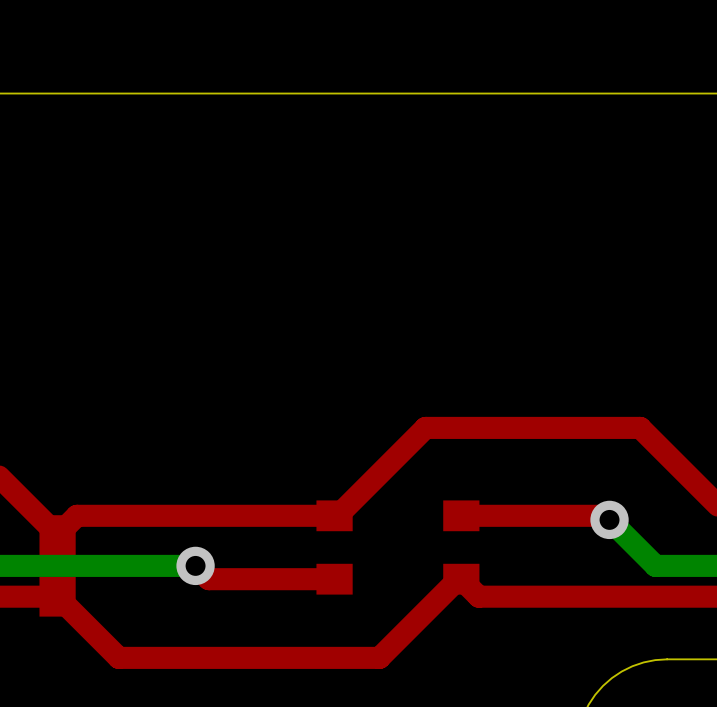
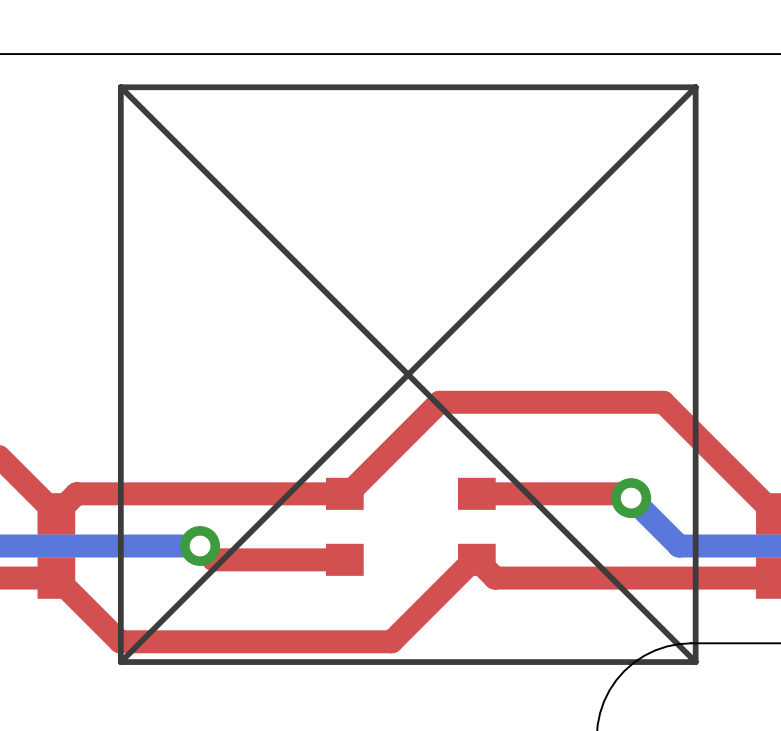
line: none -> (120, 87) (120, 662)
line: none -> (120, 87) (695, 662)
line: none -> (695, 87) (695, 662)
line: none -> (695, 87) (120, 87)
line: none -> (695, 87) (120, 662)
line: none -> (695, 662) (120, 662)

